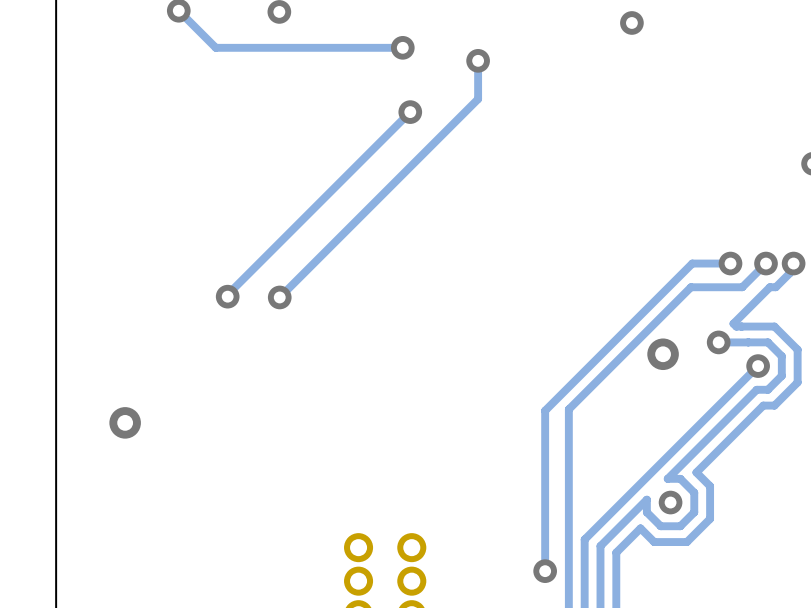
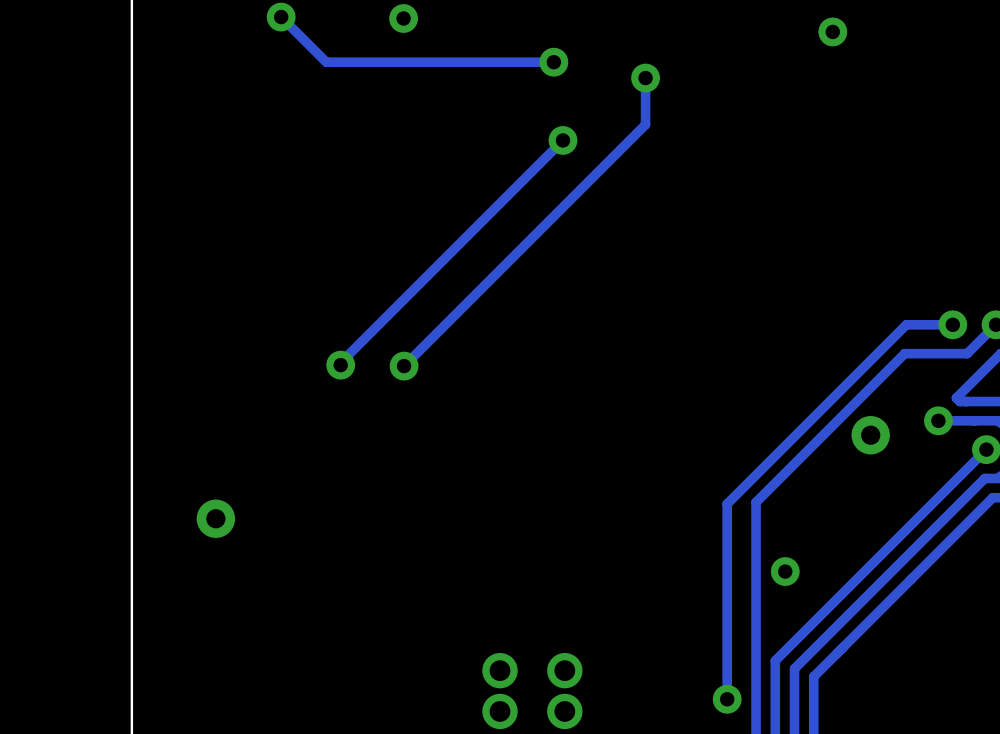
track: (696, 472) (710, 486) (710, 518) (686, 542) (654, 542) (640, 528) -> (911, 579) (843, 647)
track: (667, 478) (680, 478) (694, 492) (694, 512) (680, 526) (660, 526) (646, 512) (646, 499) -> (876, 586) (850, 612)
via position: (670, 502) -> (785, 571)

